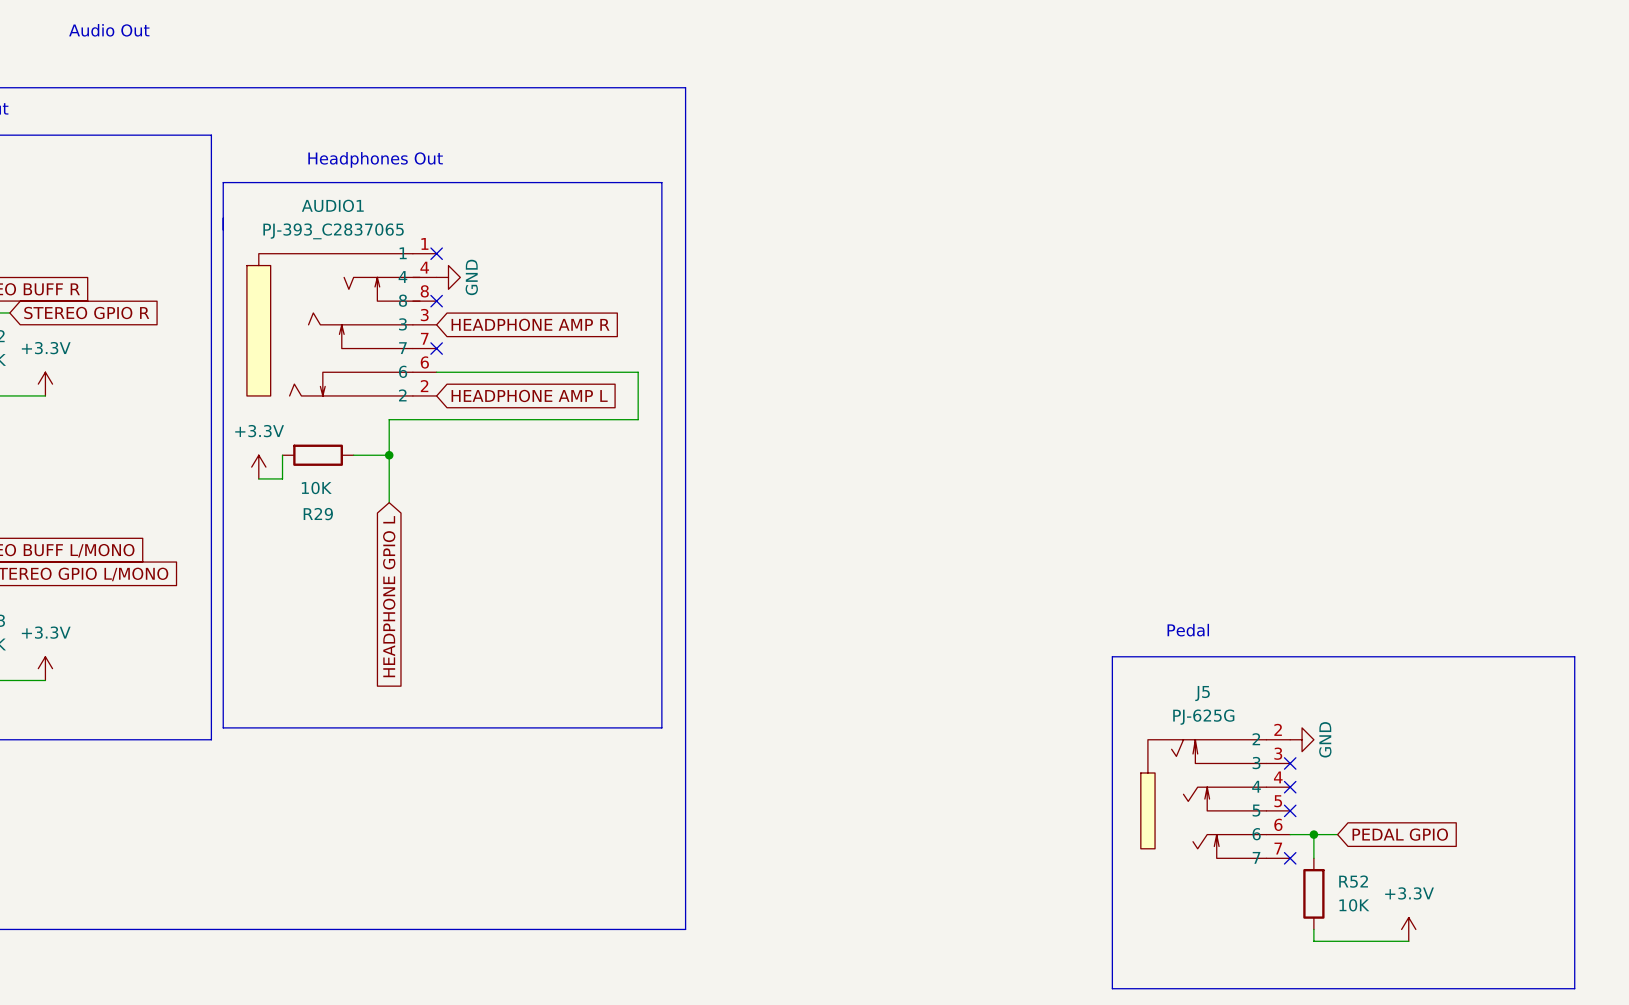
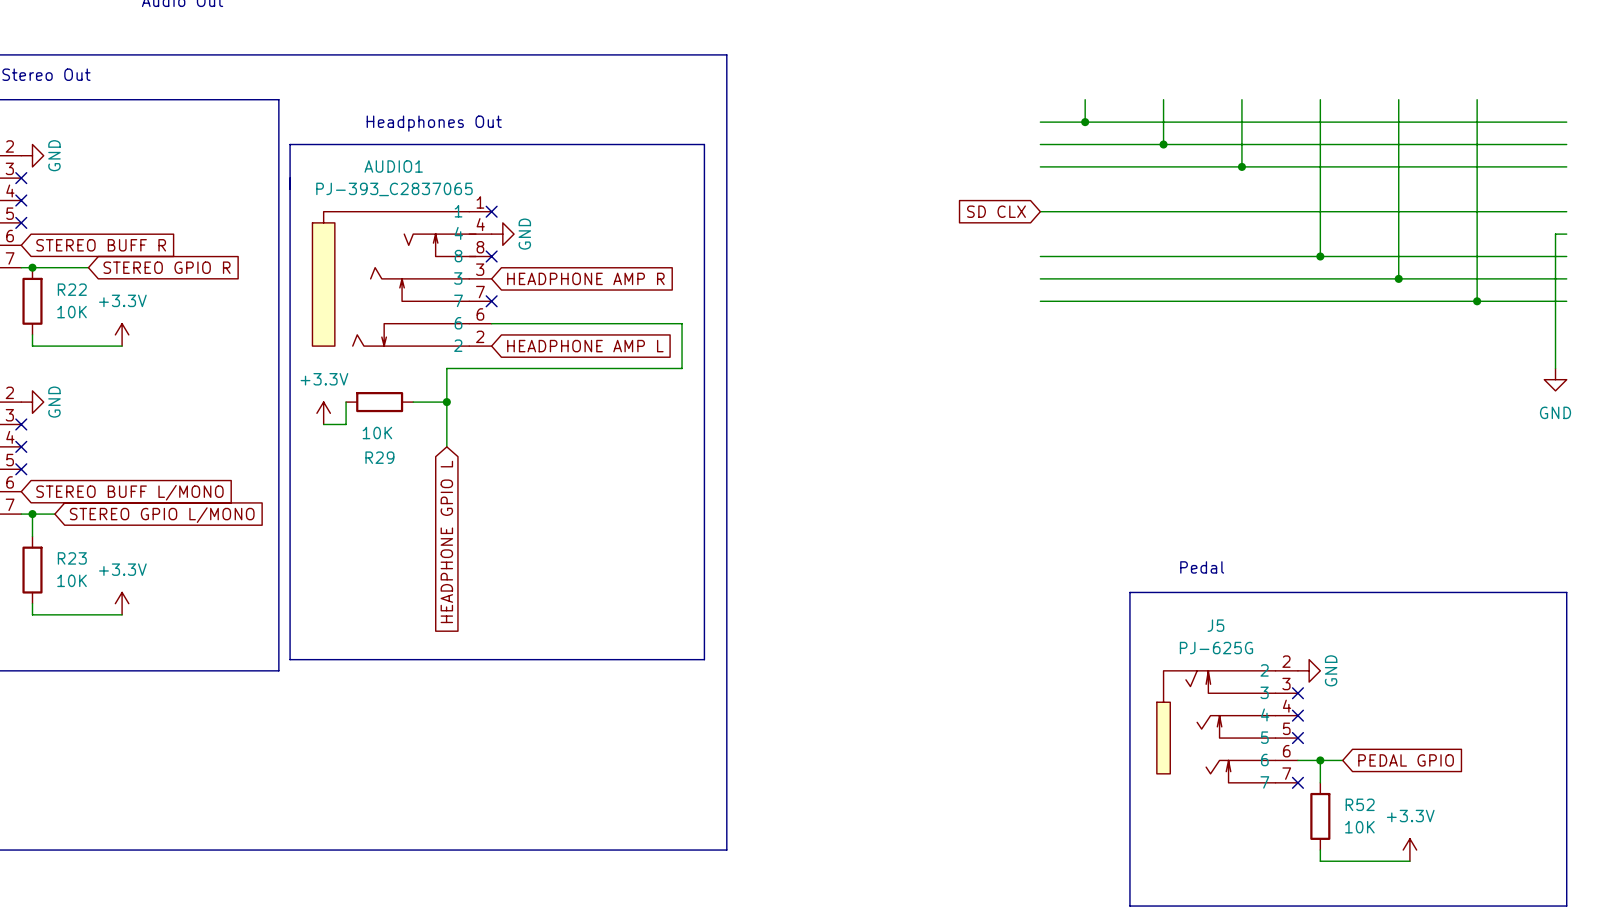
wire: none -> (1085, 99) (1085, 122)
wire: none -> (1163, 99) (1163, 144)
wire: none -> (1241, 99) (1241, 166)
wire: none -> (1320, 99) (1320, 256)
wire: none -> (1398, 99) (1398, 278)
wire: none -> (1477, 99) (1477, 301)
wire: none -> (1040, 122) (1566, 122)
junction: none -> (1085, 122)
wire: none -> (1040, 144) (1566, 144)
junction: none -> (1163, 144)
wire: none -> (1040, 166) (1566, 166)
junction: none -> (1241, 166)
global label: none -> SD CLX (996, 211)
wire: none -> (1040, 211) (1566, 211)
wire: none -> (1566, 234) (1555, 234) (1555, 368)
wire: none -> (1040, 256) (1566, 256)
junction: none -> (1320, 256)
wire: none -> (1040, 278) (1566, 278)
junction: none -> (1398, 278)
wire: none -> (1040, 301) (1566, 301)
junction: none -> (1477, 301)
power symbol: none -> GND (1555, 379)

